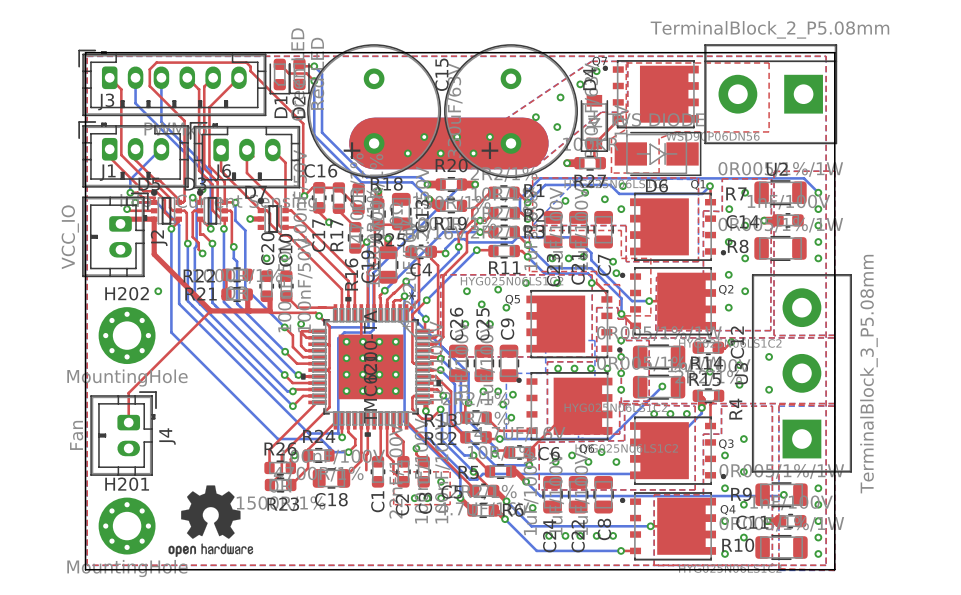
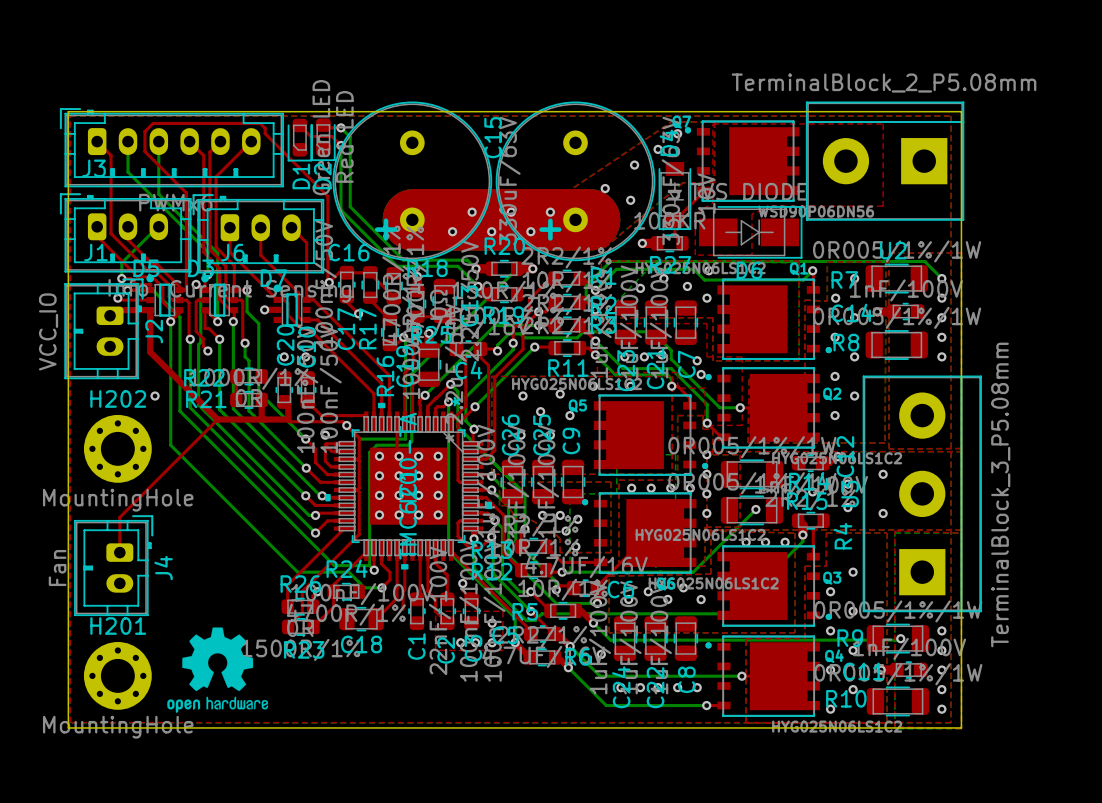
top zone outline: none -> (499, 482) (499, 505) (507, 505) (513, 513) (513, 519) (526, 517) (536, 523) (536, 533) (554, 533) (560, 538) (560, 552) (611, 552) (611, 482) (499, 482)

